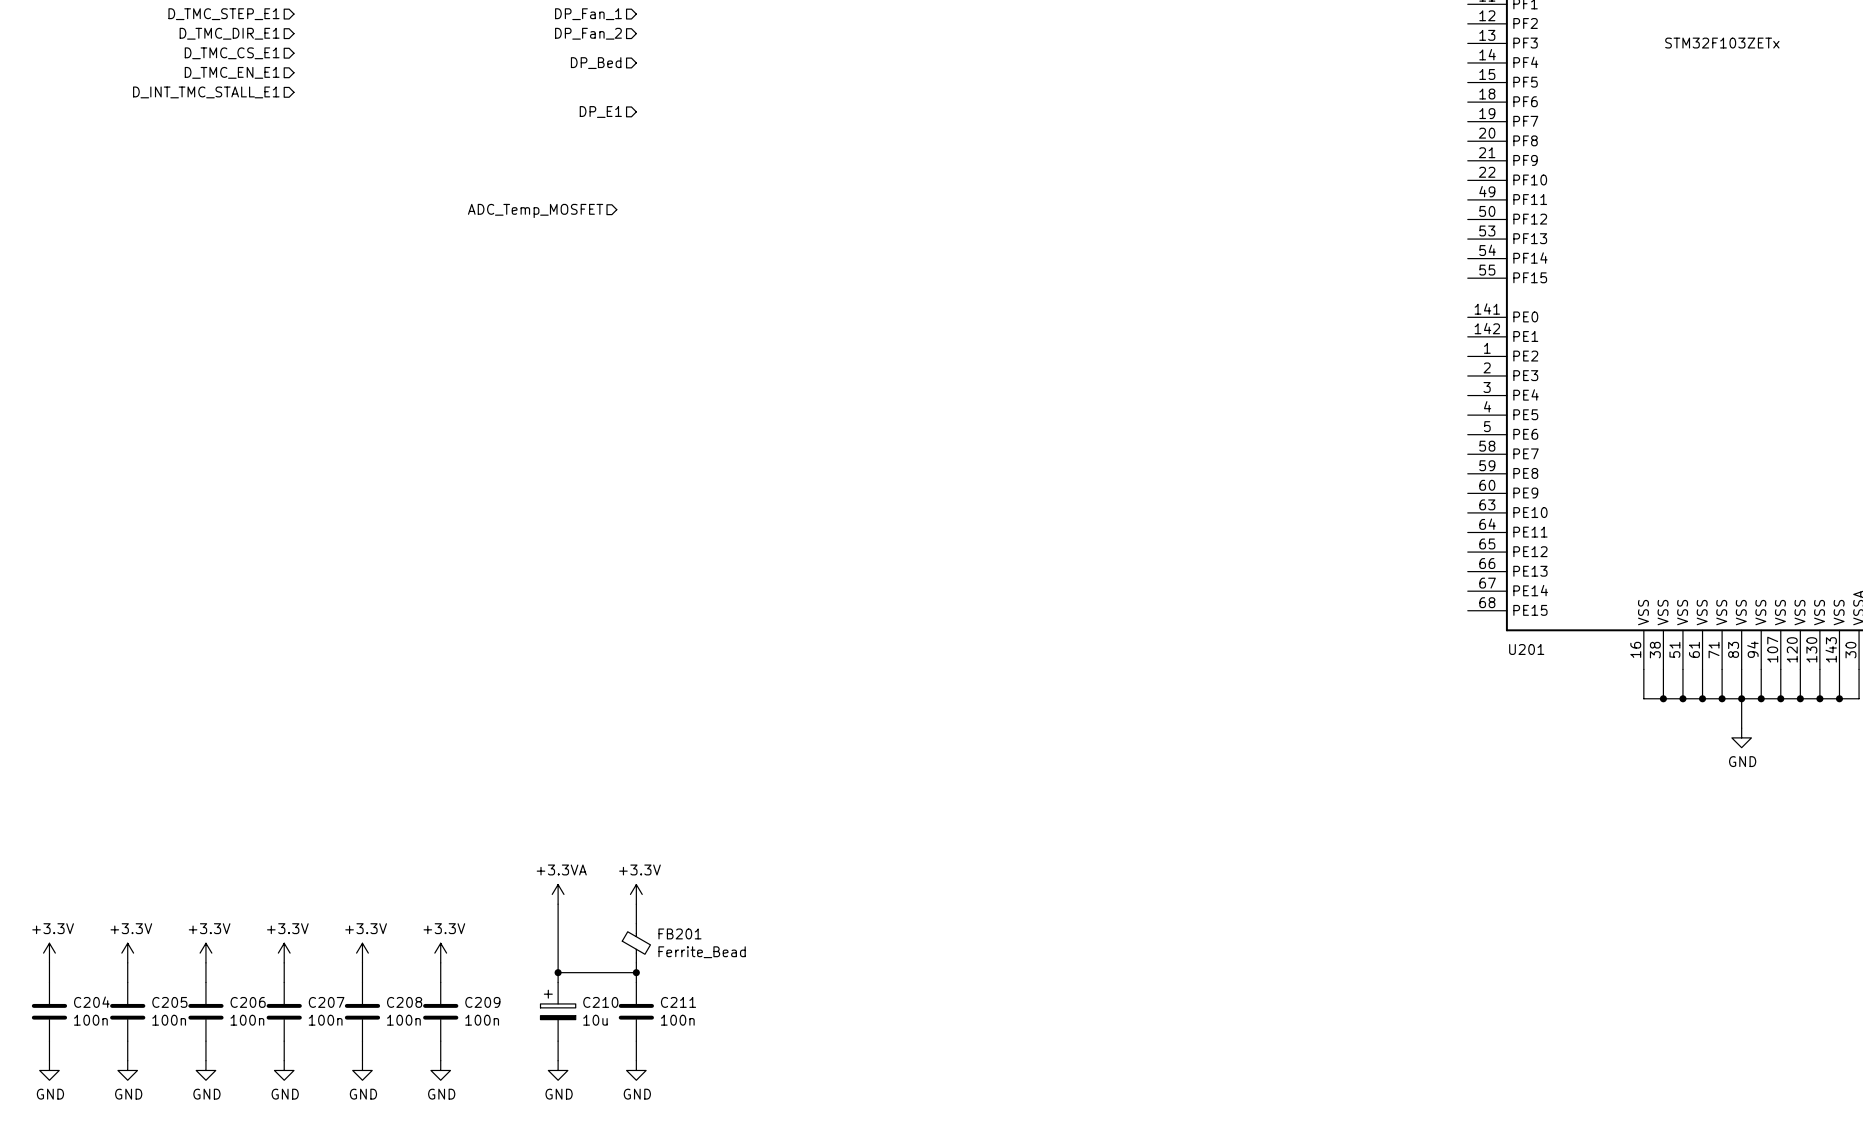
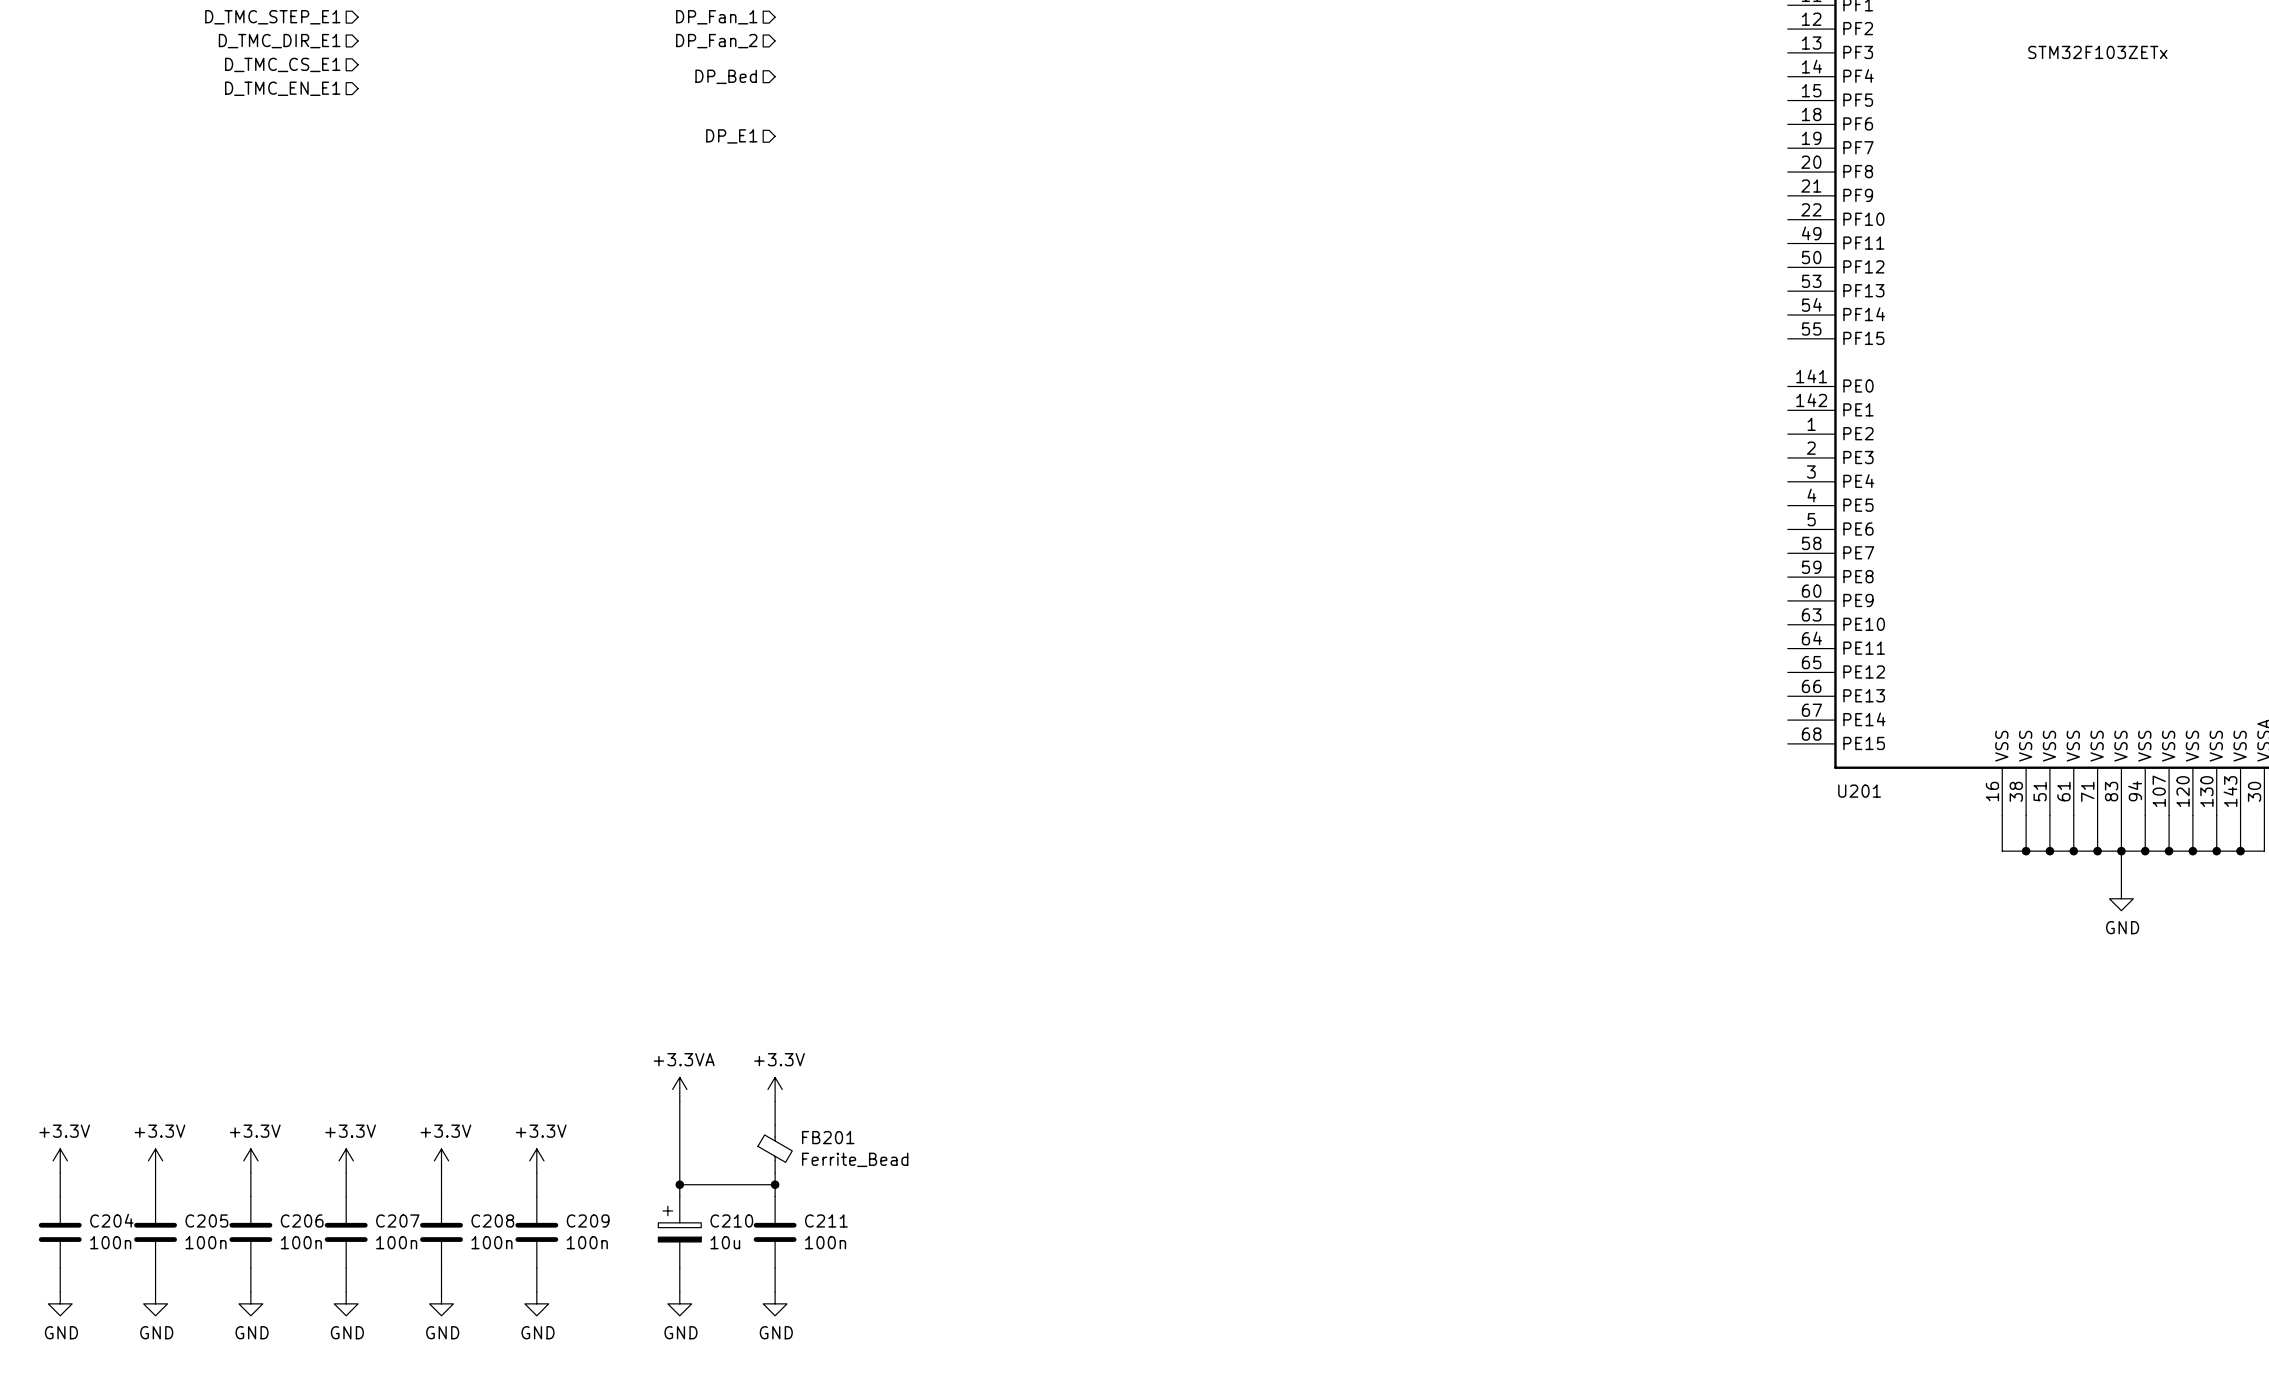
hierarchical label: D_INT_TMC_STALL_E1 (206, 92) -> none
hierarchical label: ADC_Temp_MOSFET (535, 210) -> none

